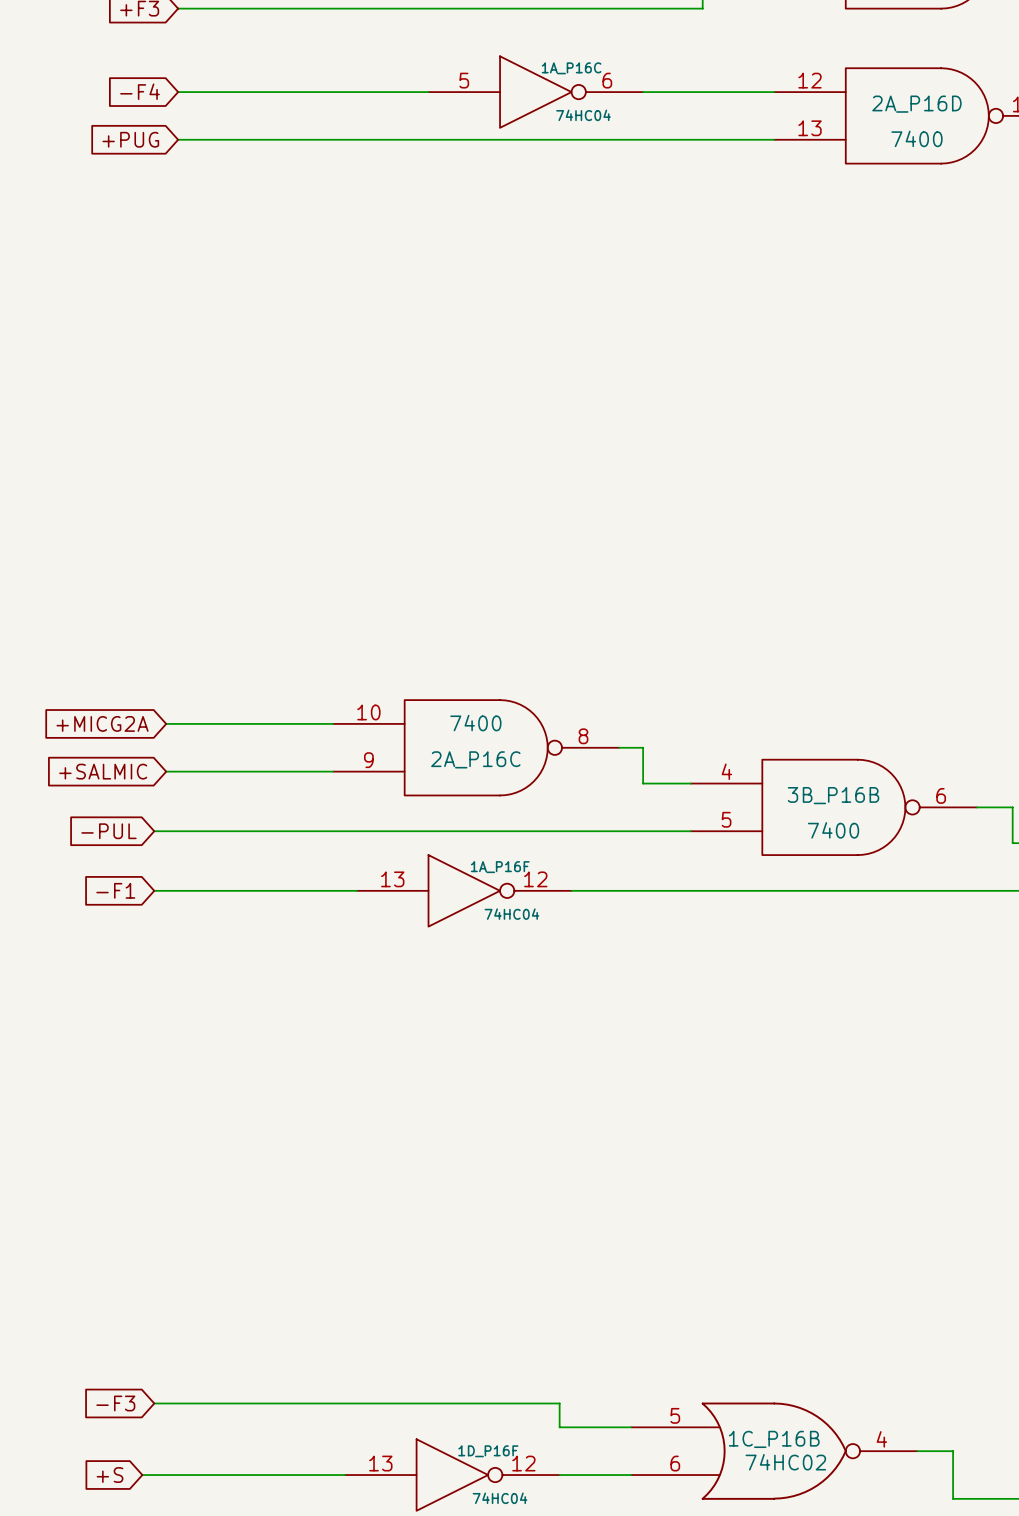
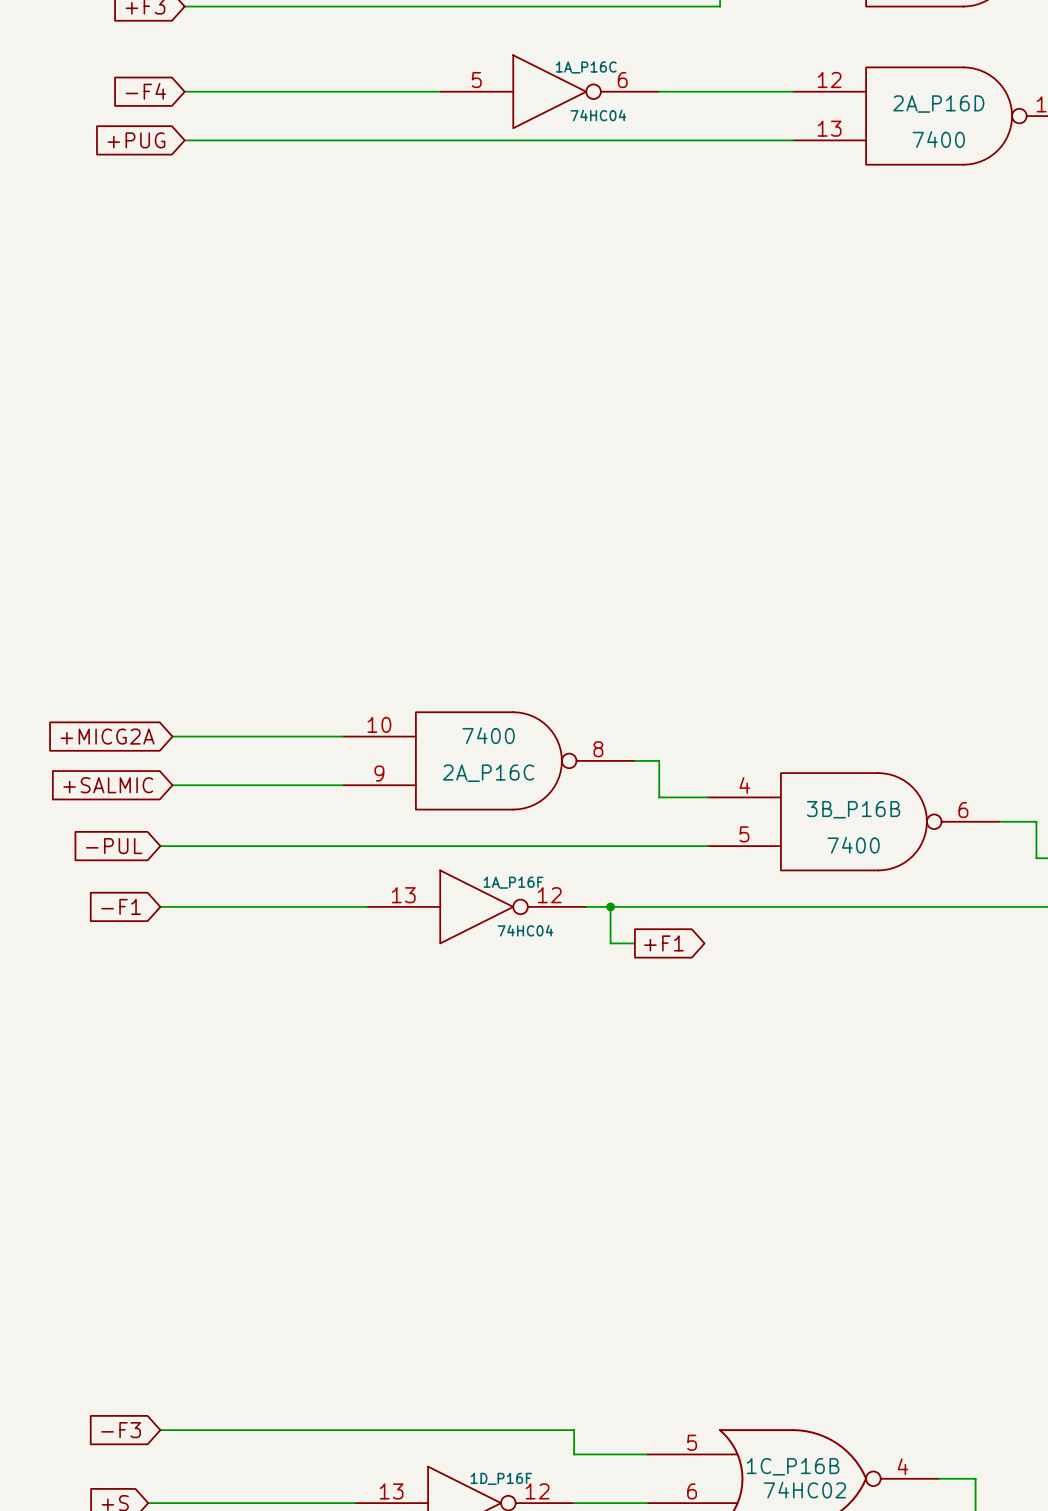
wire: none -> (610, 906) (610, 943) (634, 943)
junction: none -> (610, 906)
global label: none -> +F1 (663, 943)

